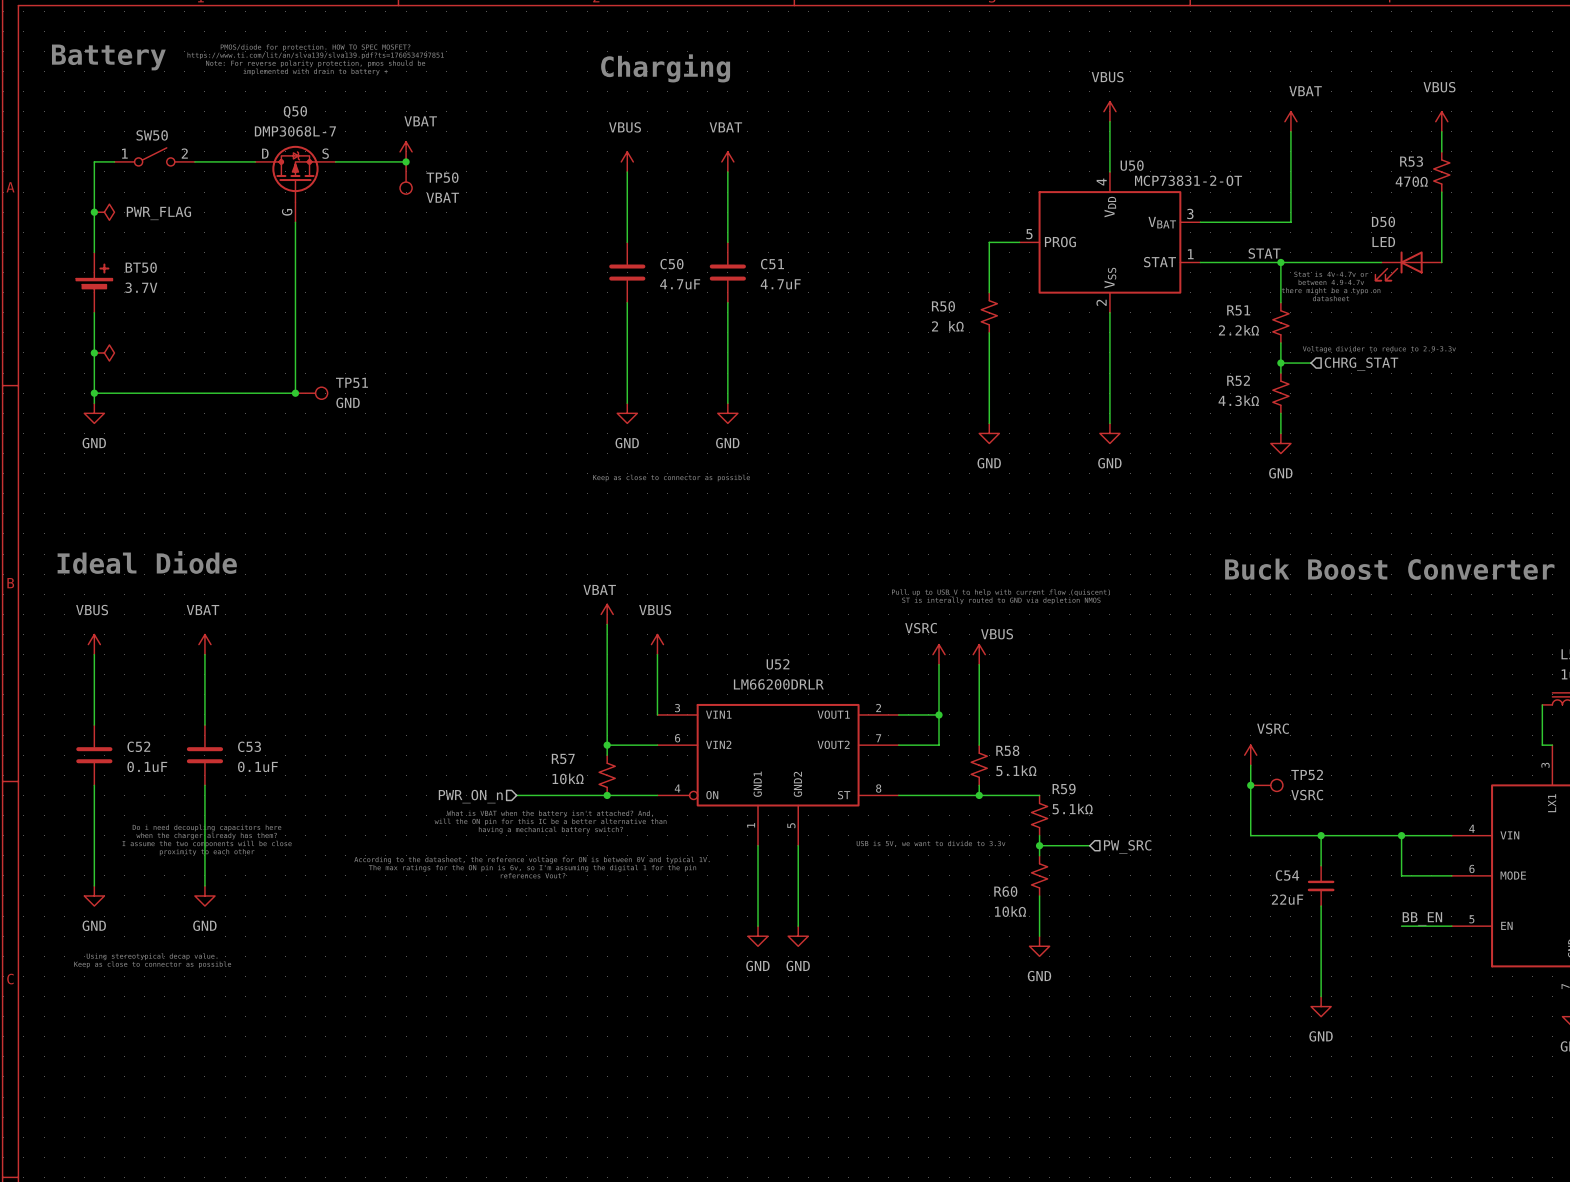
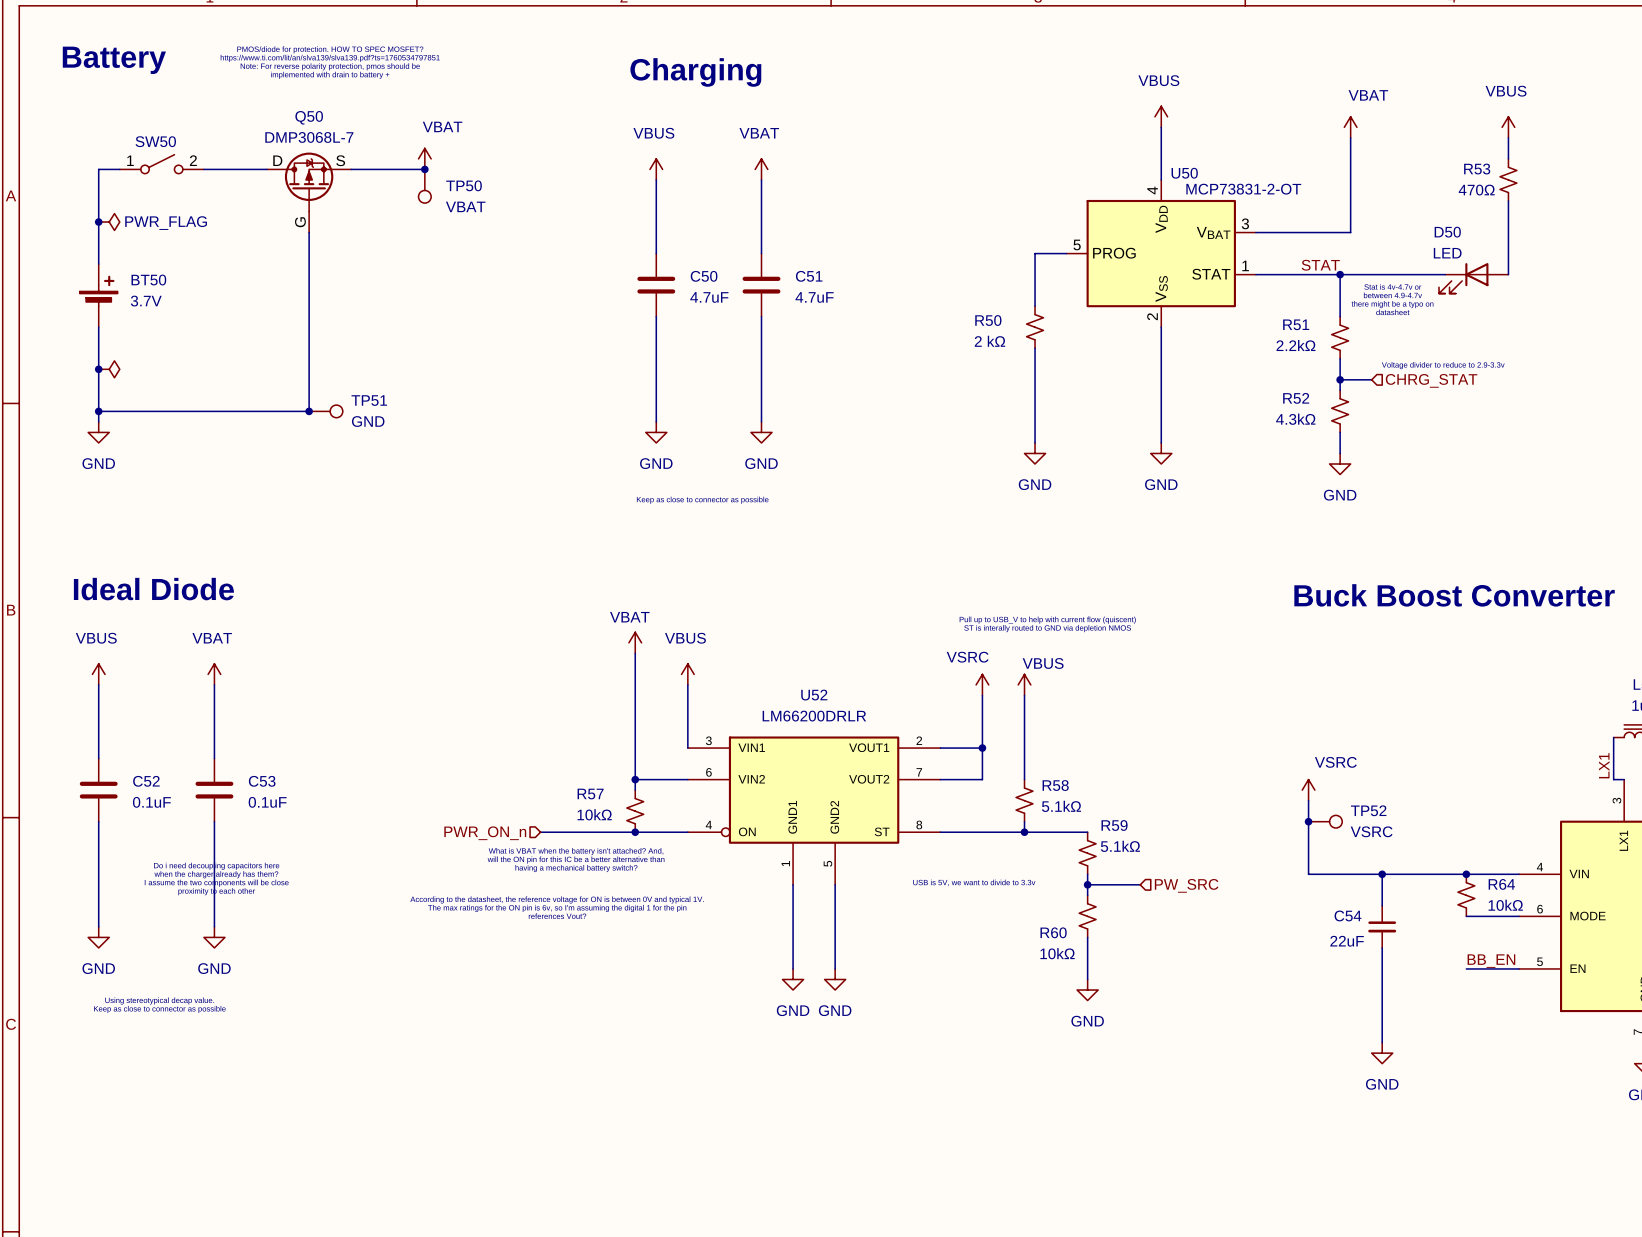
label: none -> LX1 (1604, 765)
R64: none -> 10kΩ (1466, 895)

